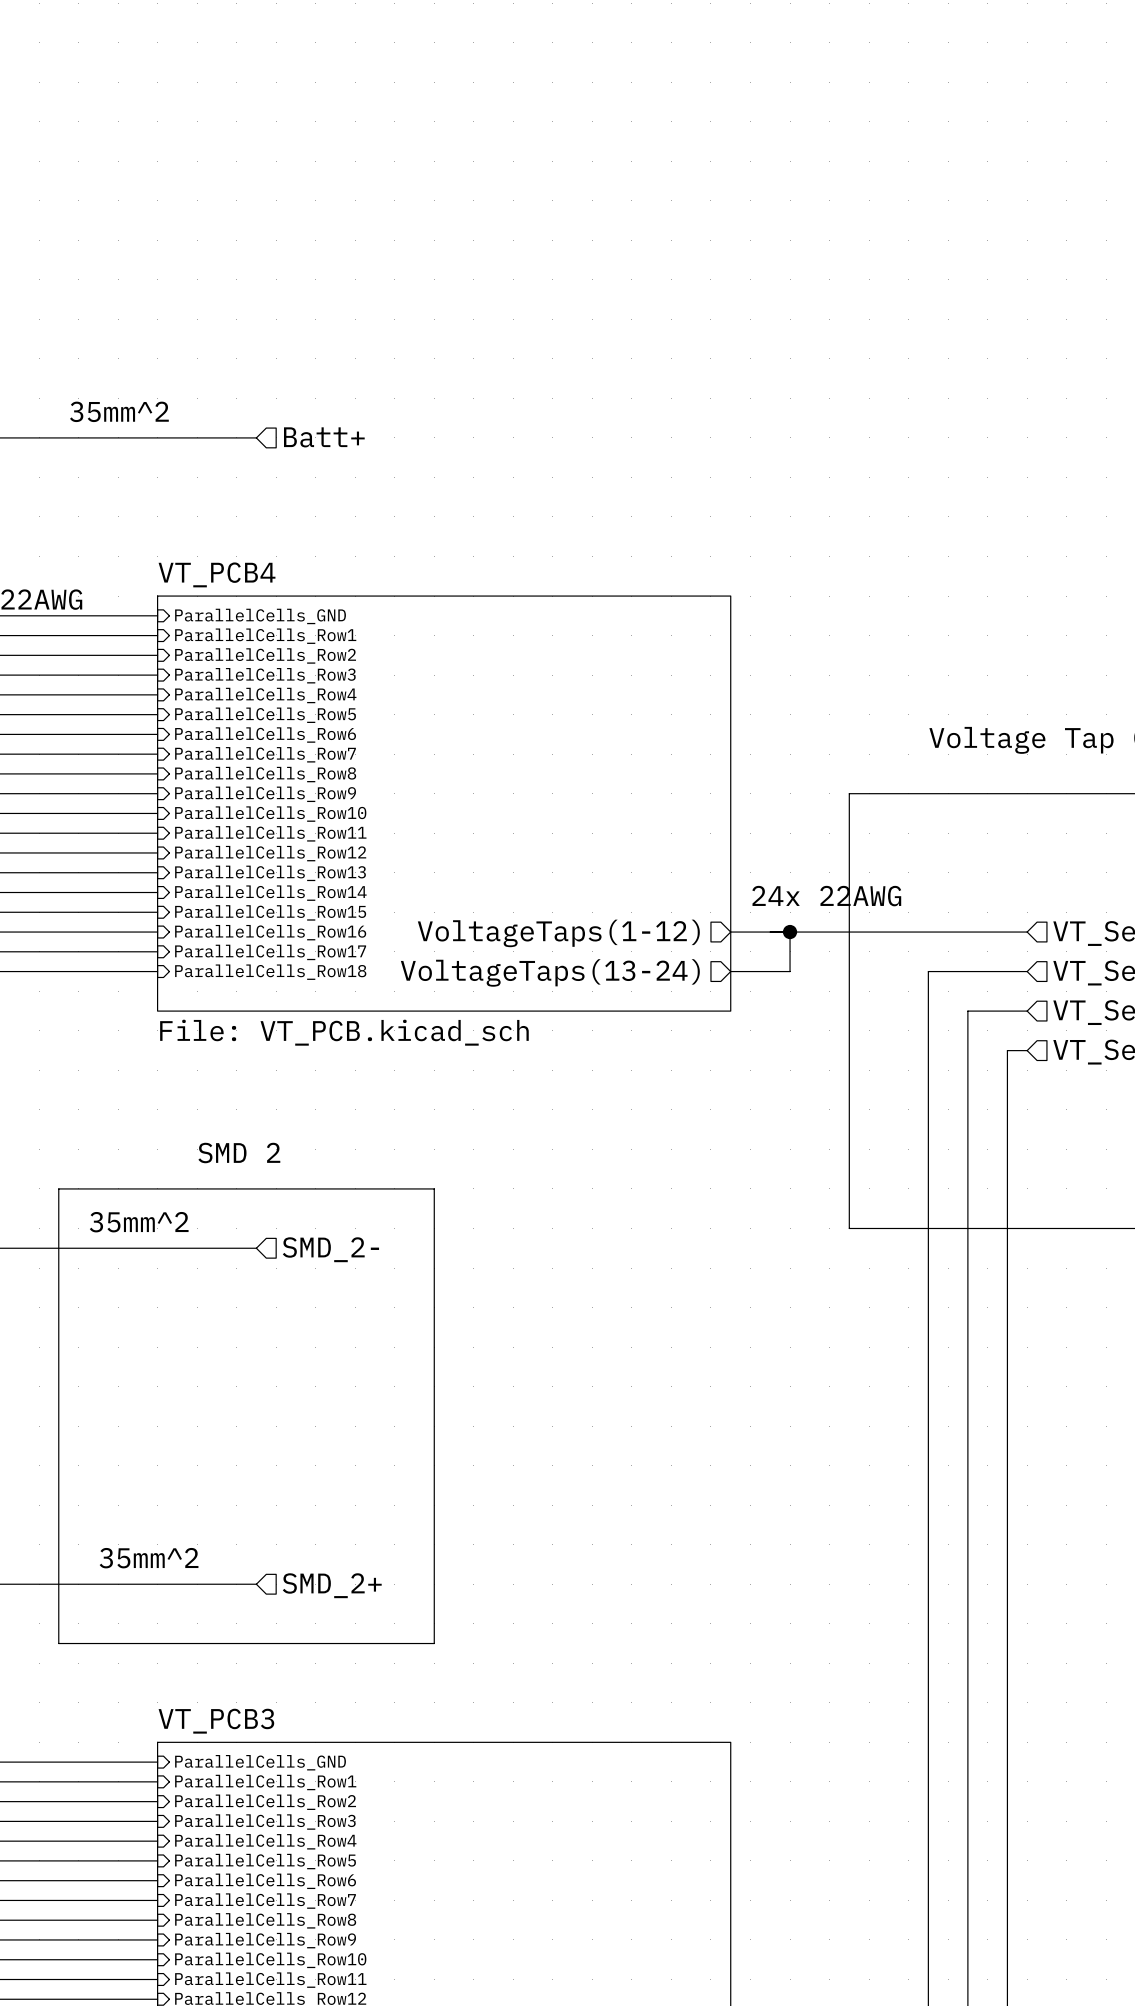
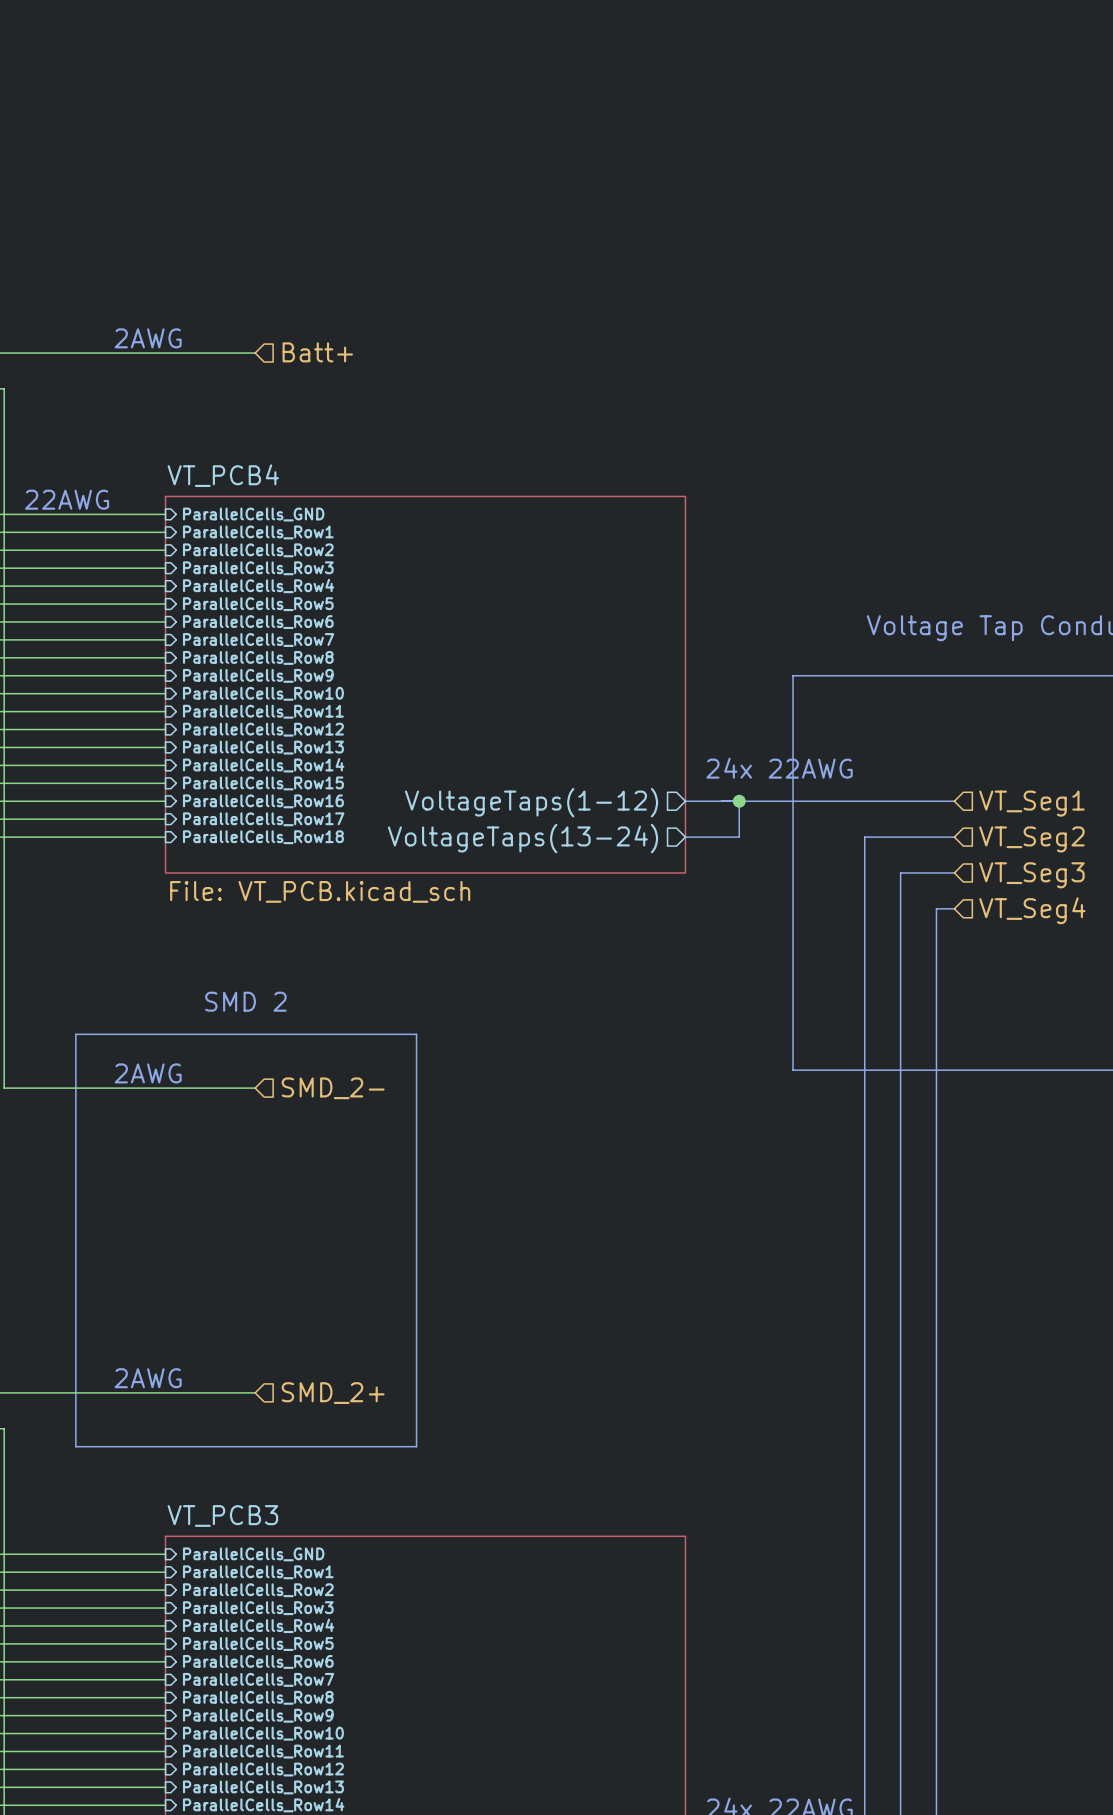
text: 35mm^2 (119, 411) -> none
text: none -> 2AWG (148, 338)
text: 35mm^2 (139, 1222) -> 2AWG (148, 1073)
text: 35mm^2 (149, 1558) -> 2AWG (148, 1378)

